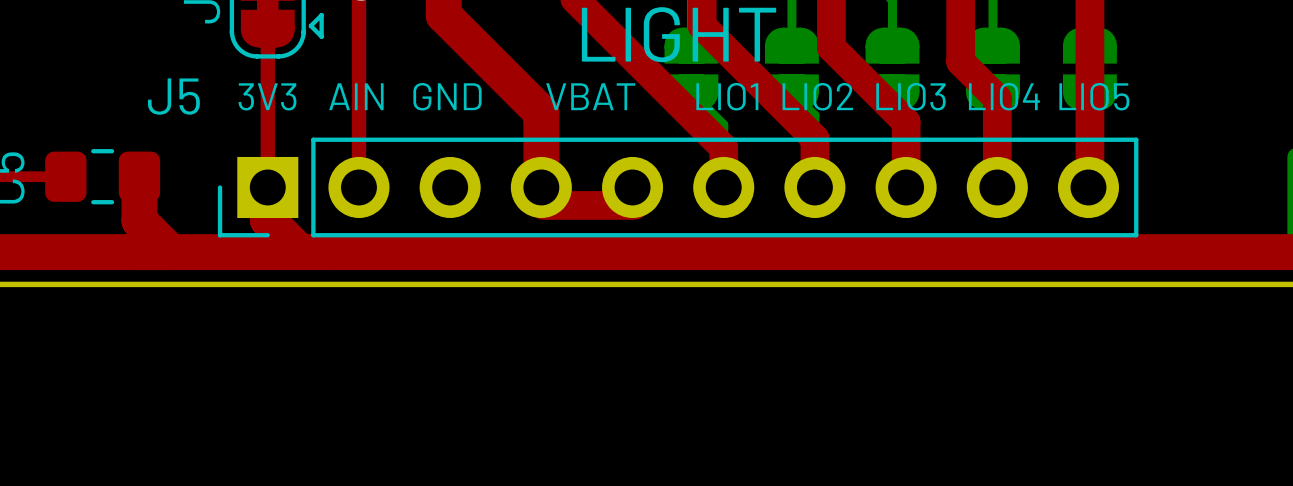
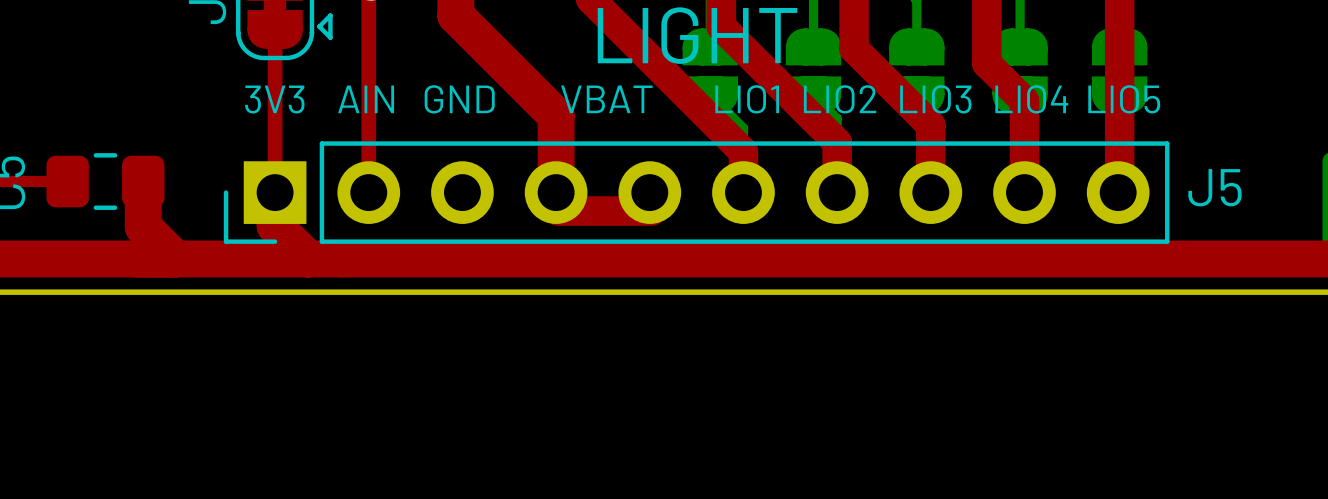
J5 name position: J5 (173, 96) -> J5 (1214, 187)

